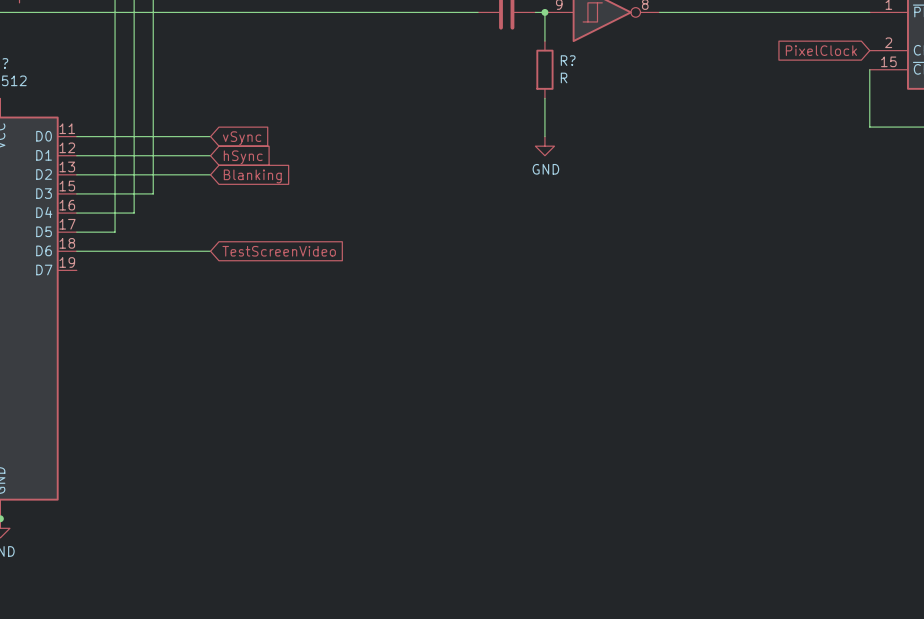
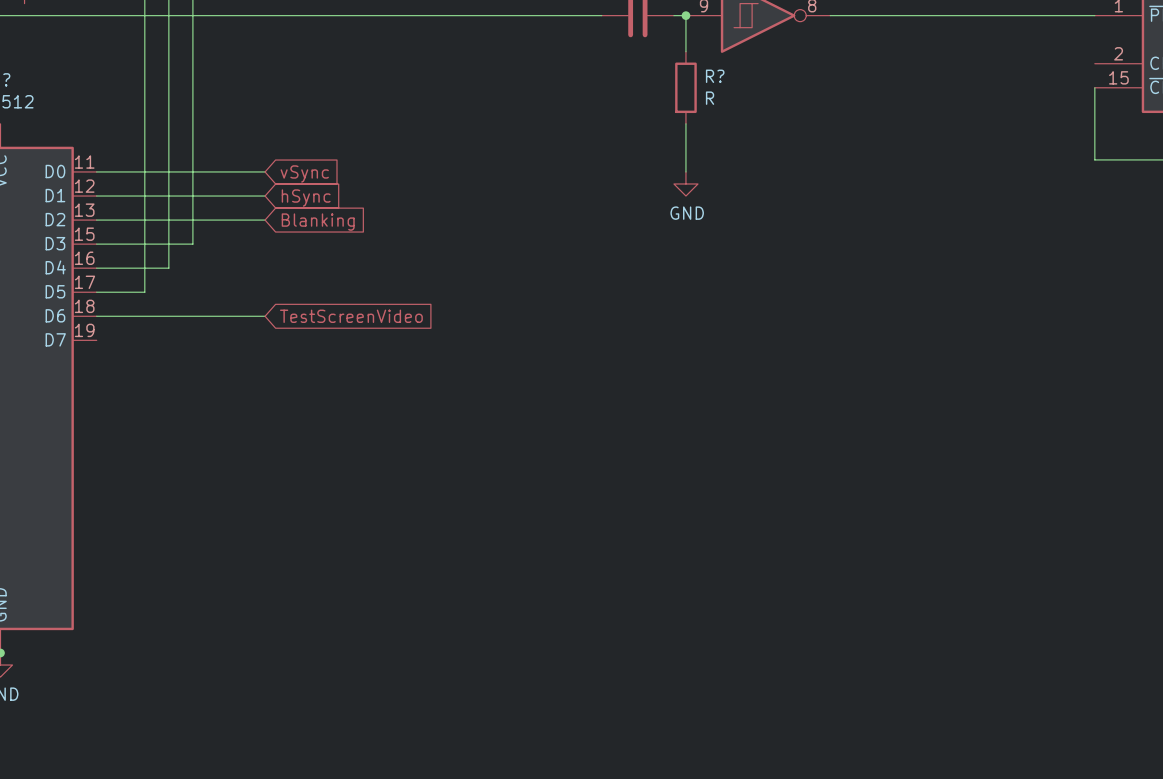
global label: PixelClock (821, 50) -> none

